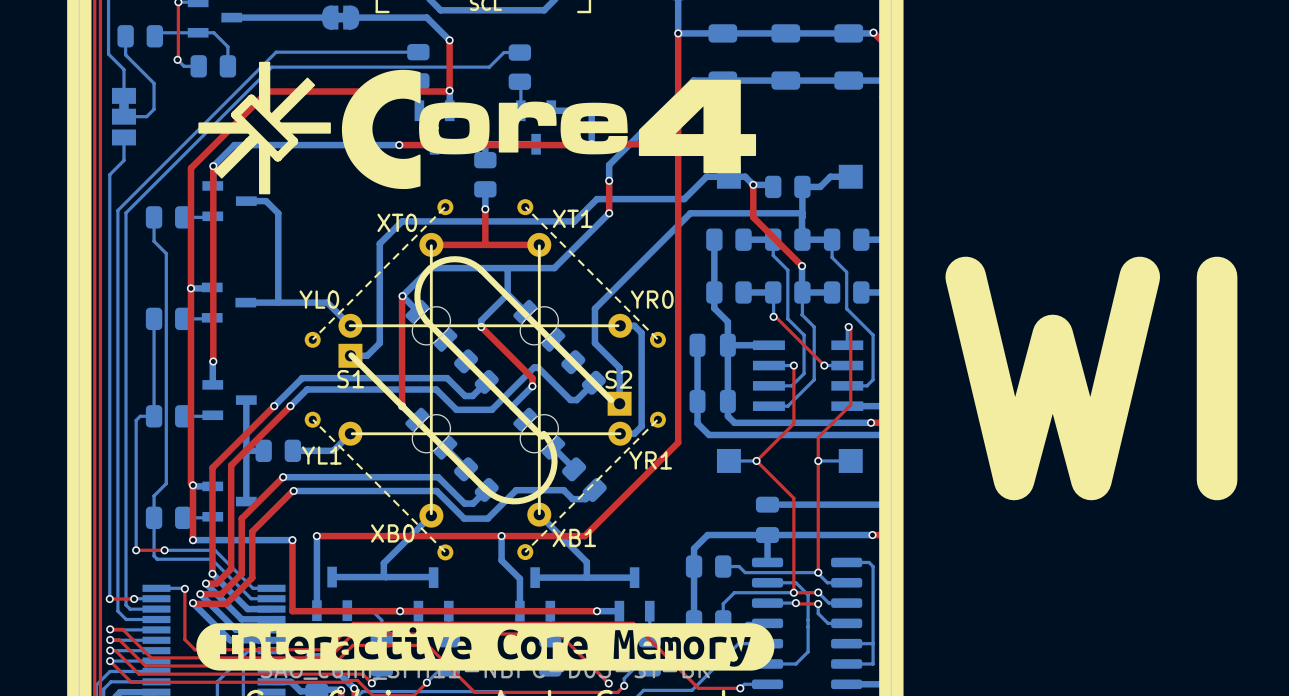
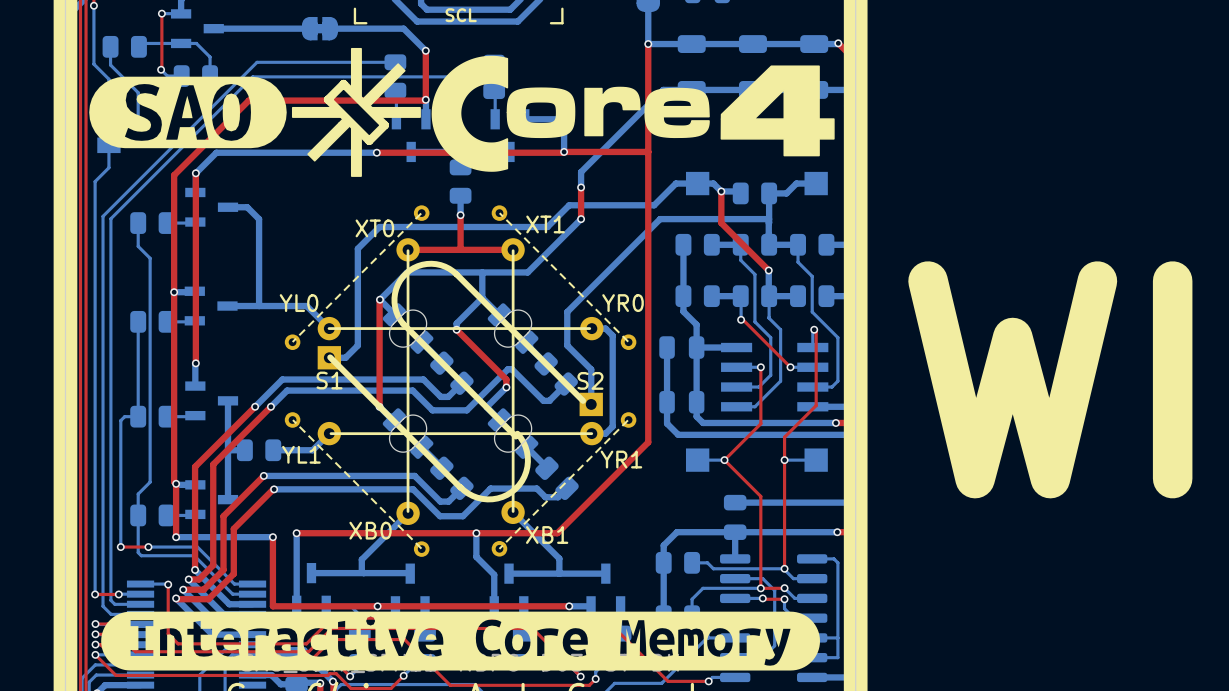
drawing: none -> [89, 76, 287, 149]
drawing position: (477, 128) -> (563, 112)
drawing shape: [196, 623, 775, 671] -> [101, 611, 821, 671]

